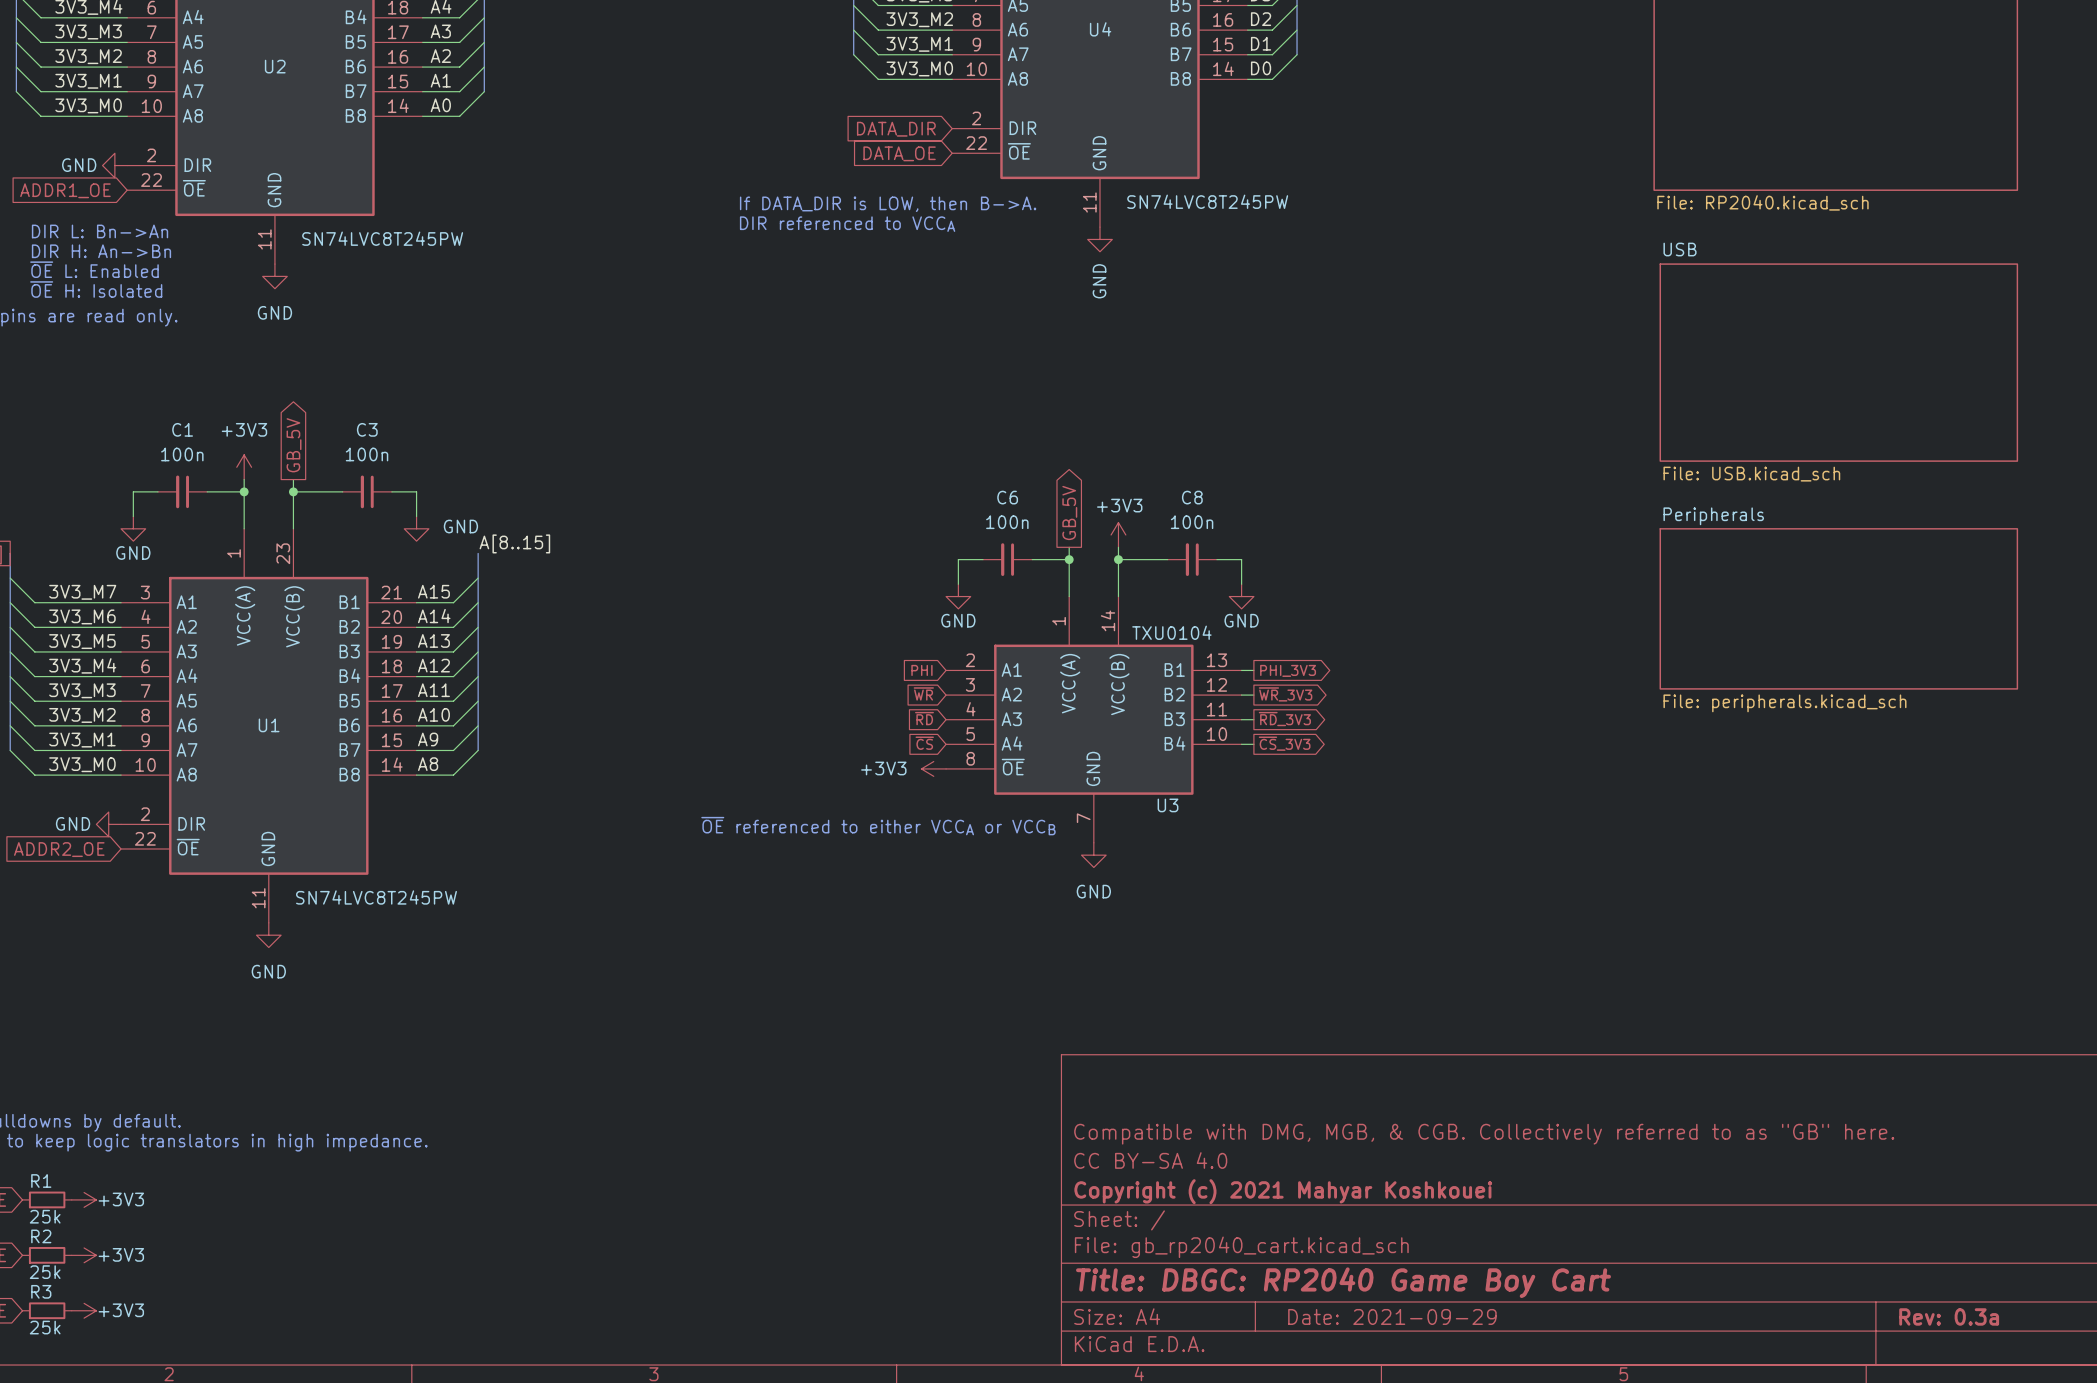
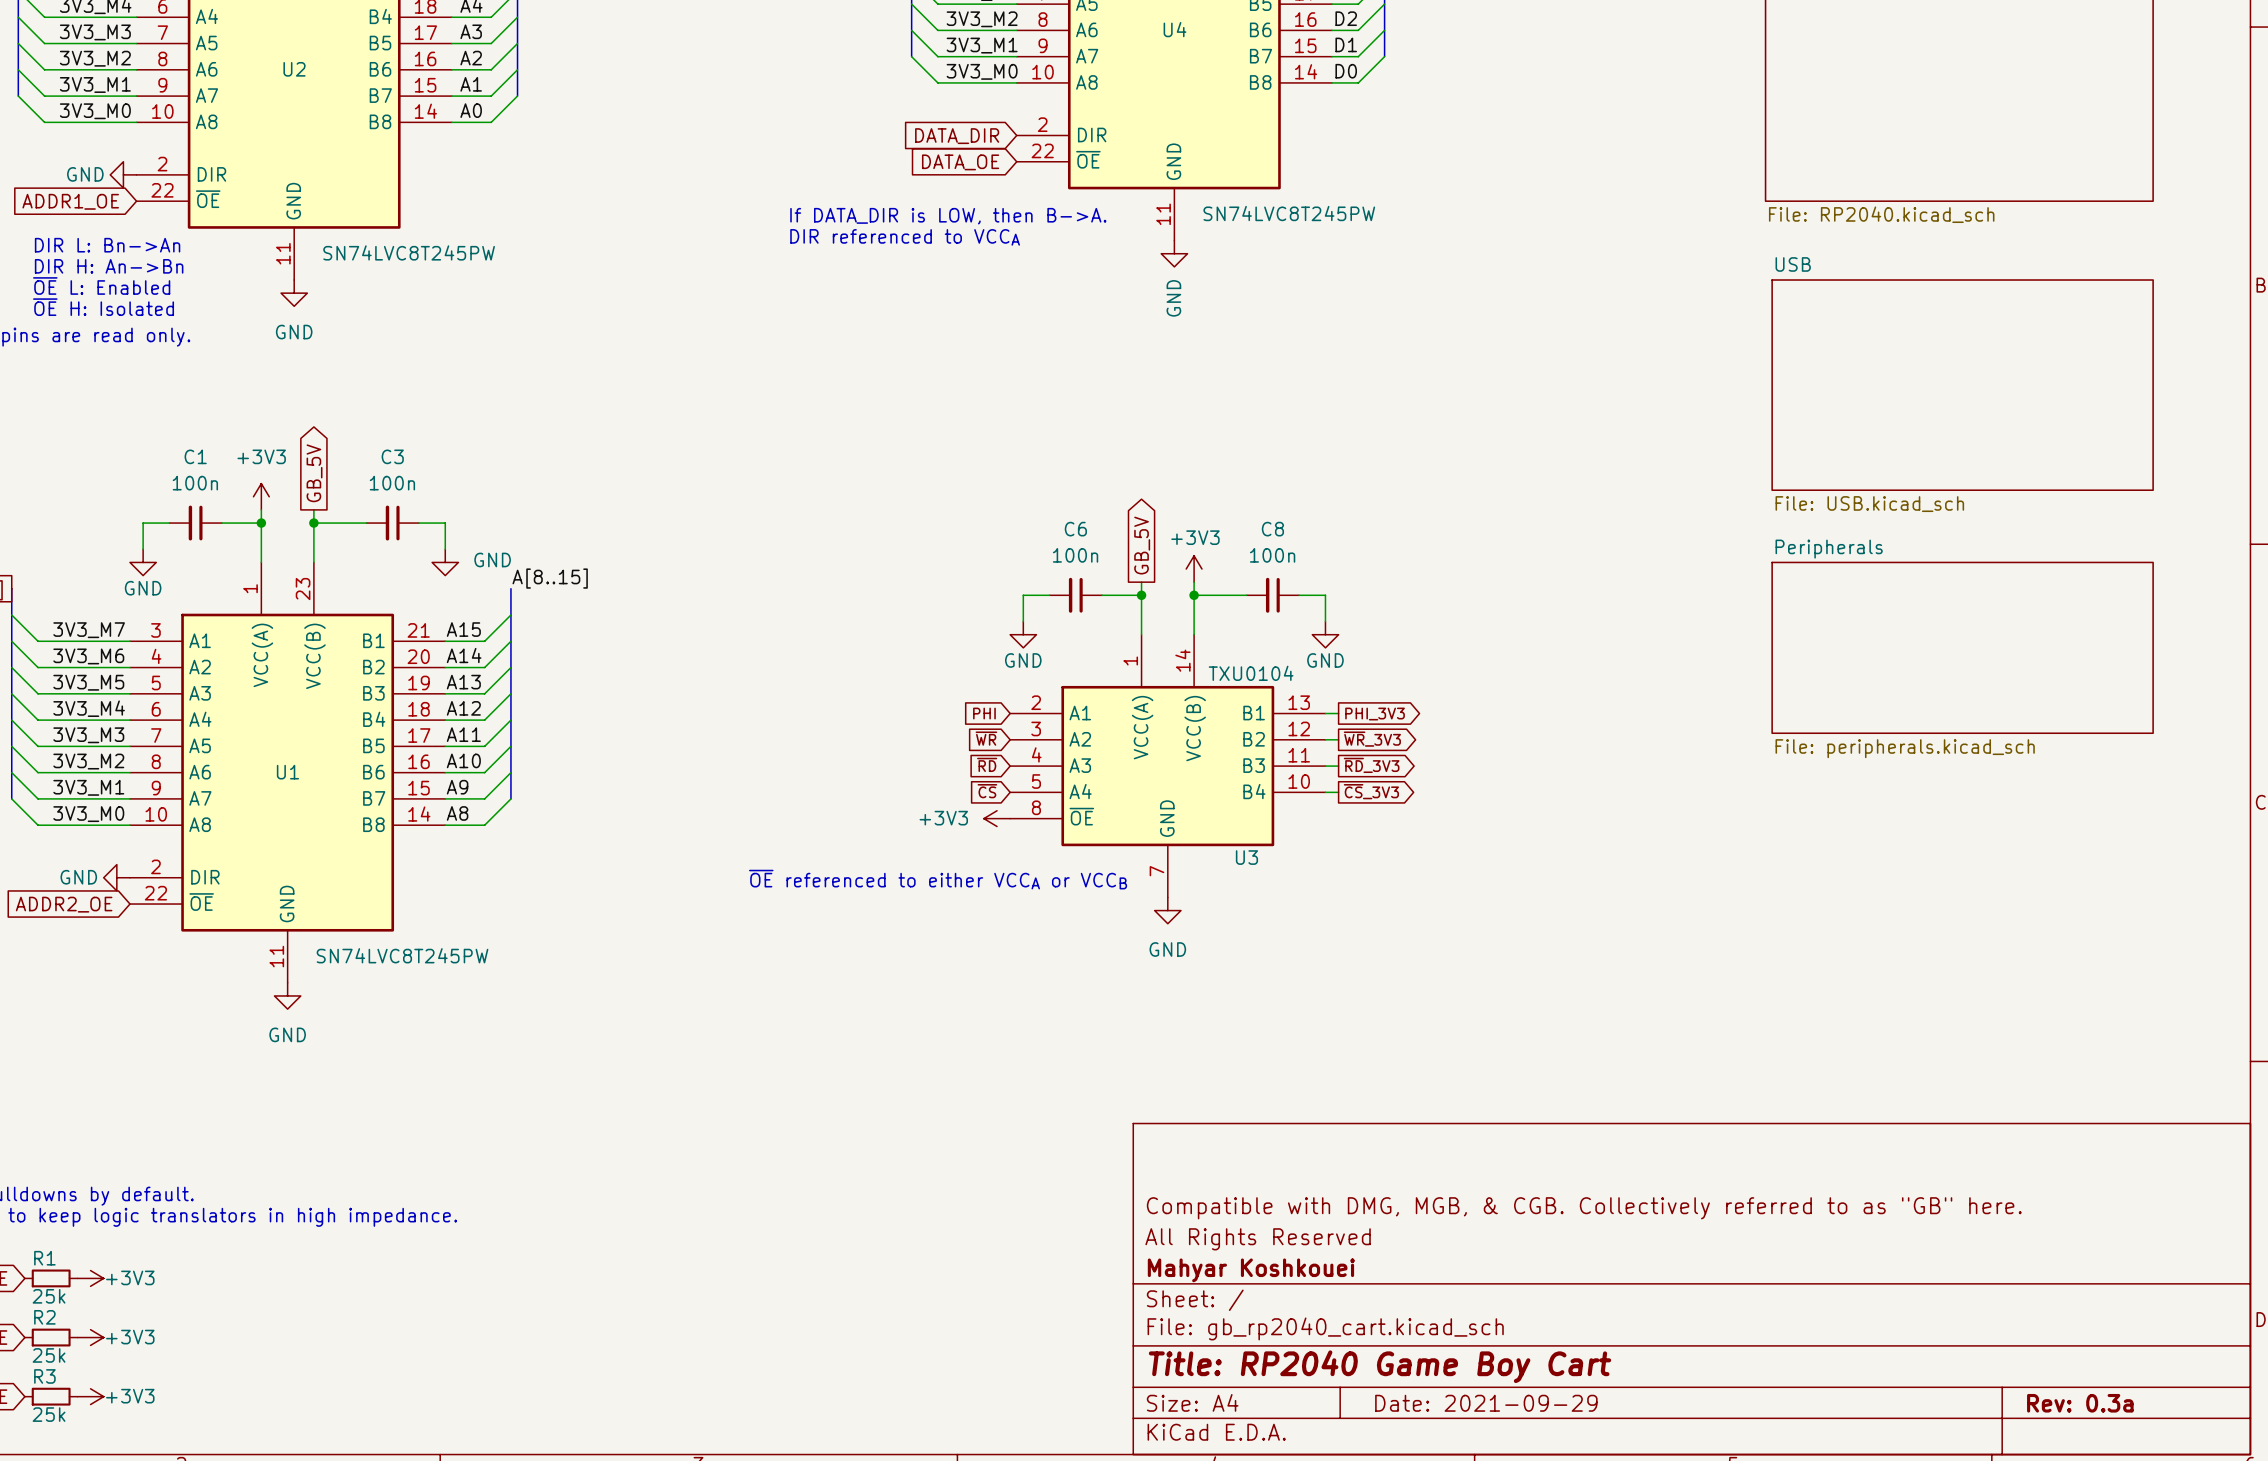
title block: CC BY-SA 4.0 (1150, 1160) -> All Rights Reserved (1258, 1239)
title block: Copyright (c) 2021 Mahyar Koshkouei (1283, 1191) -> Mahyar Koshkouei (1251, 1270)
title block: Title: DBGC: RP2040 Game Boy Cart (1343, 1282) -> Title: RP2040 Game Boy Cart (1380, 1366)

